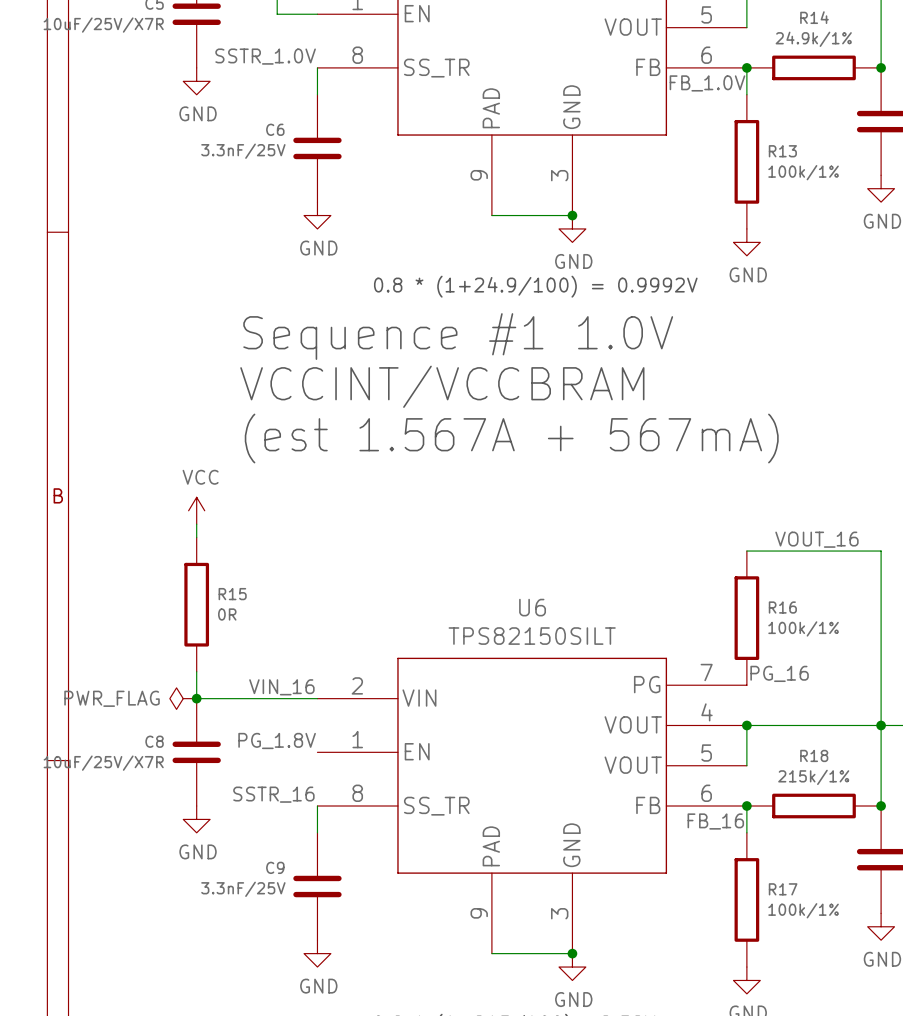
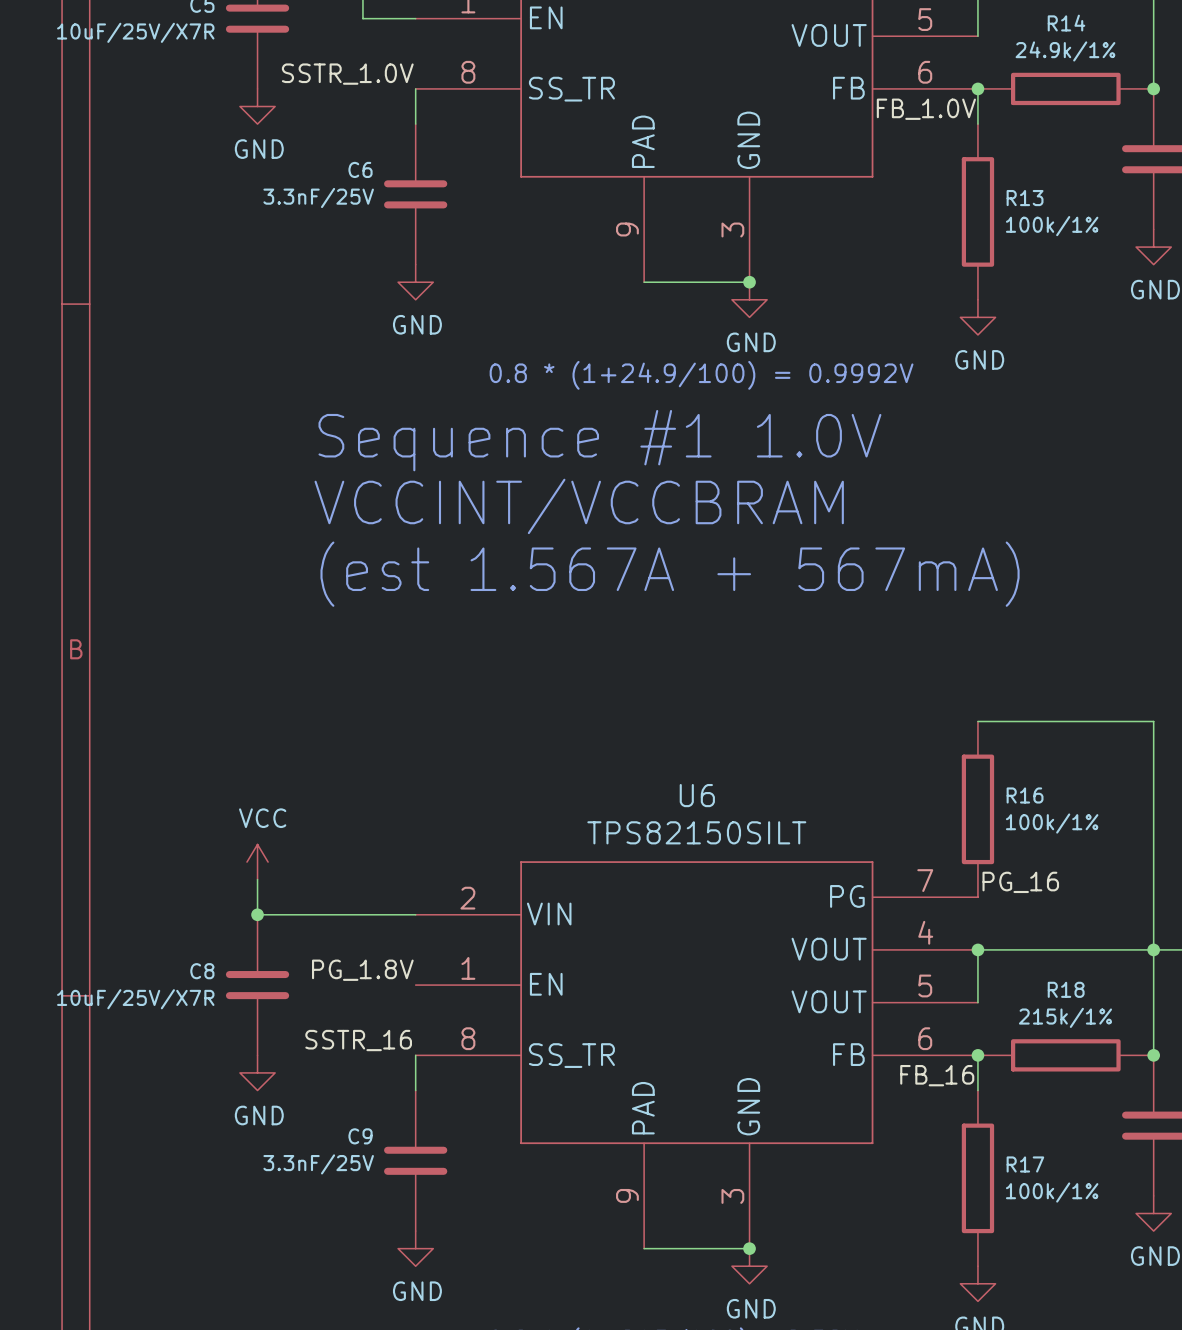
power symbol position: VCC (196, 510) -> VCC (257, 862)
wire: (196, 524) (196, 537) -> none
label: VOUT_16 (816, 539) -> none
R15: 0R (196, 604) -> none
label: VIN_16 (281, 687) -> none
power symbol: PWR_FLAG (183, 698) -> none

